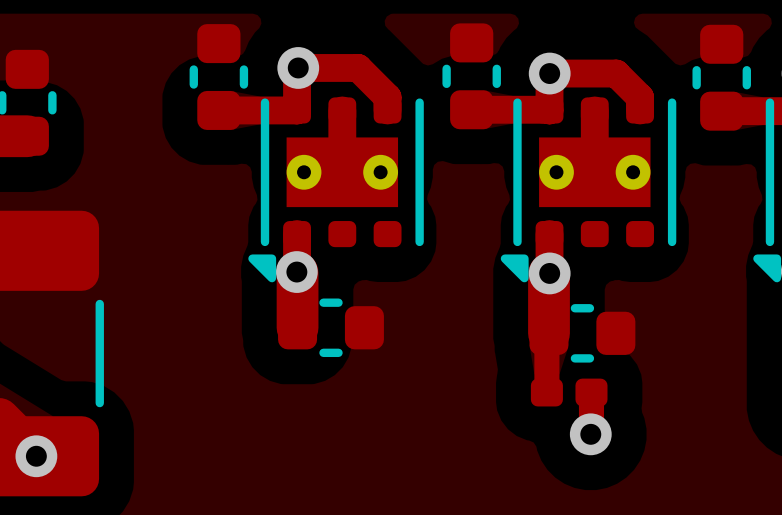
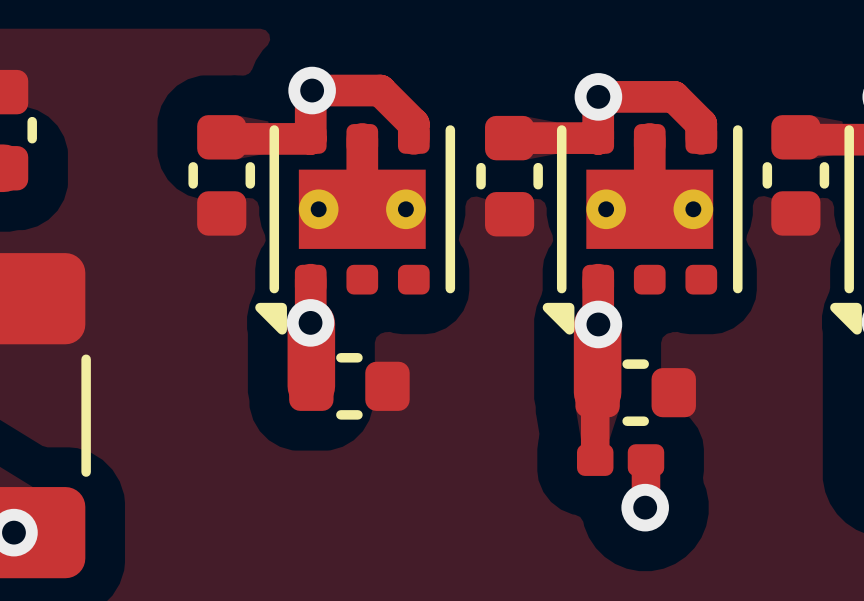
part position: (471, 76) -> (509, 176)
part position: (218, 77) -> (221, 175)
part position: (721, 77) -> (795, 175)

